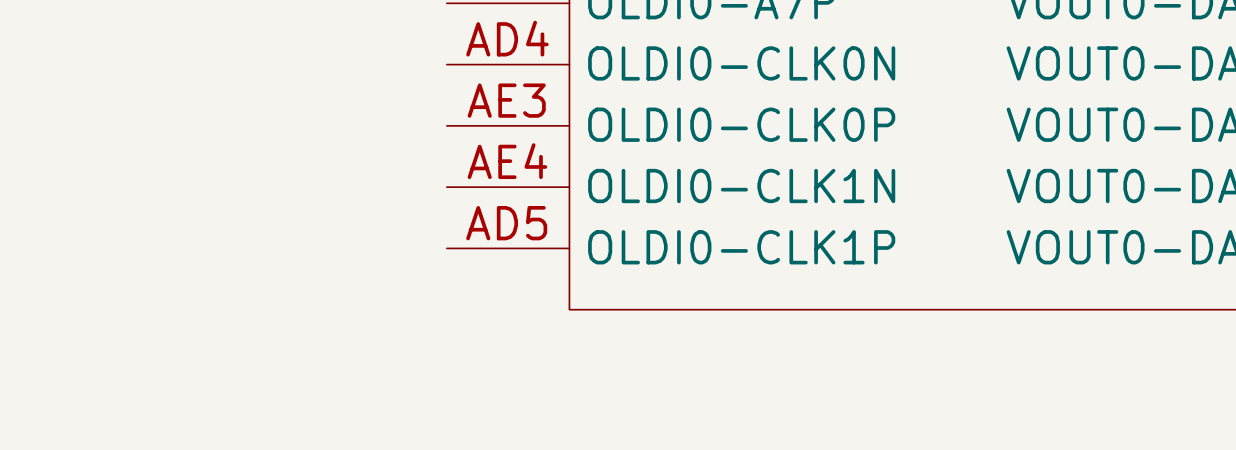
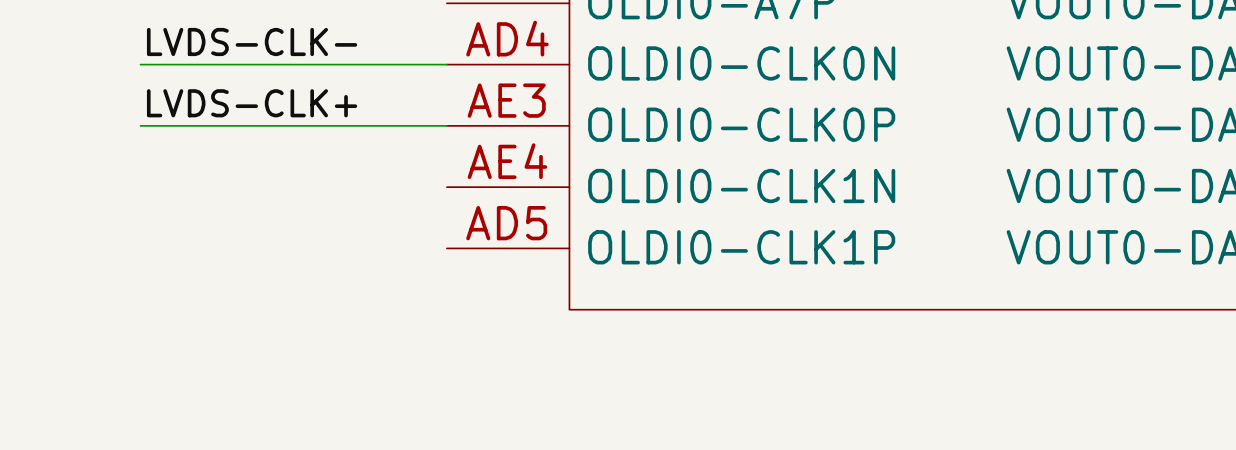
label: none -> LVDS-CLK- (252, 41)
wire: none -> (140, 64) (446, 64)
label: none -> LVDS-CLK+ (252, 103)
wire: none -> (140, 125) (446, 125)

